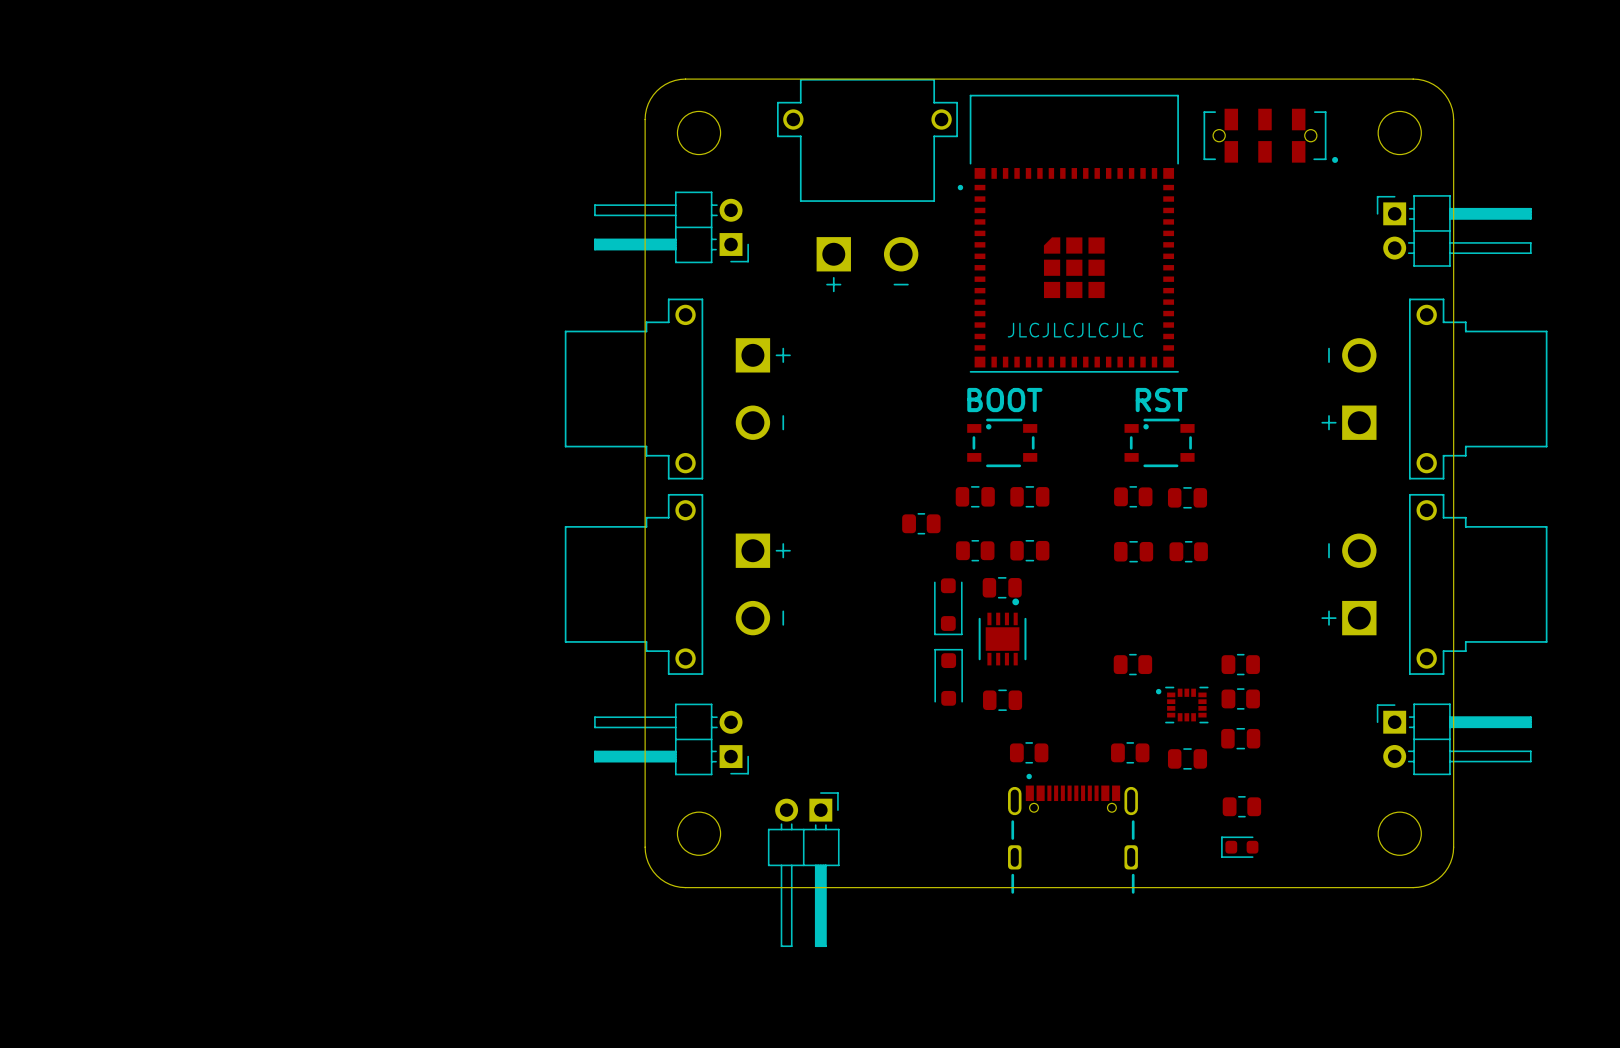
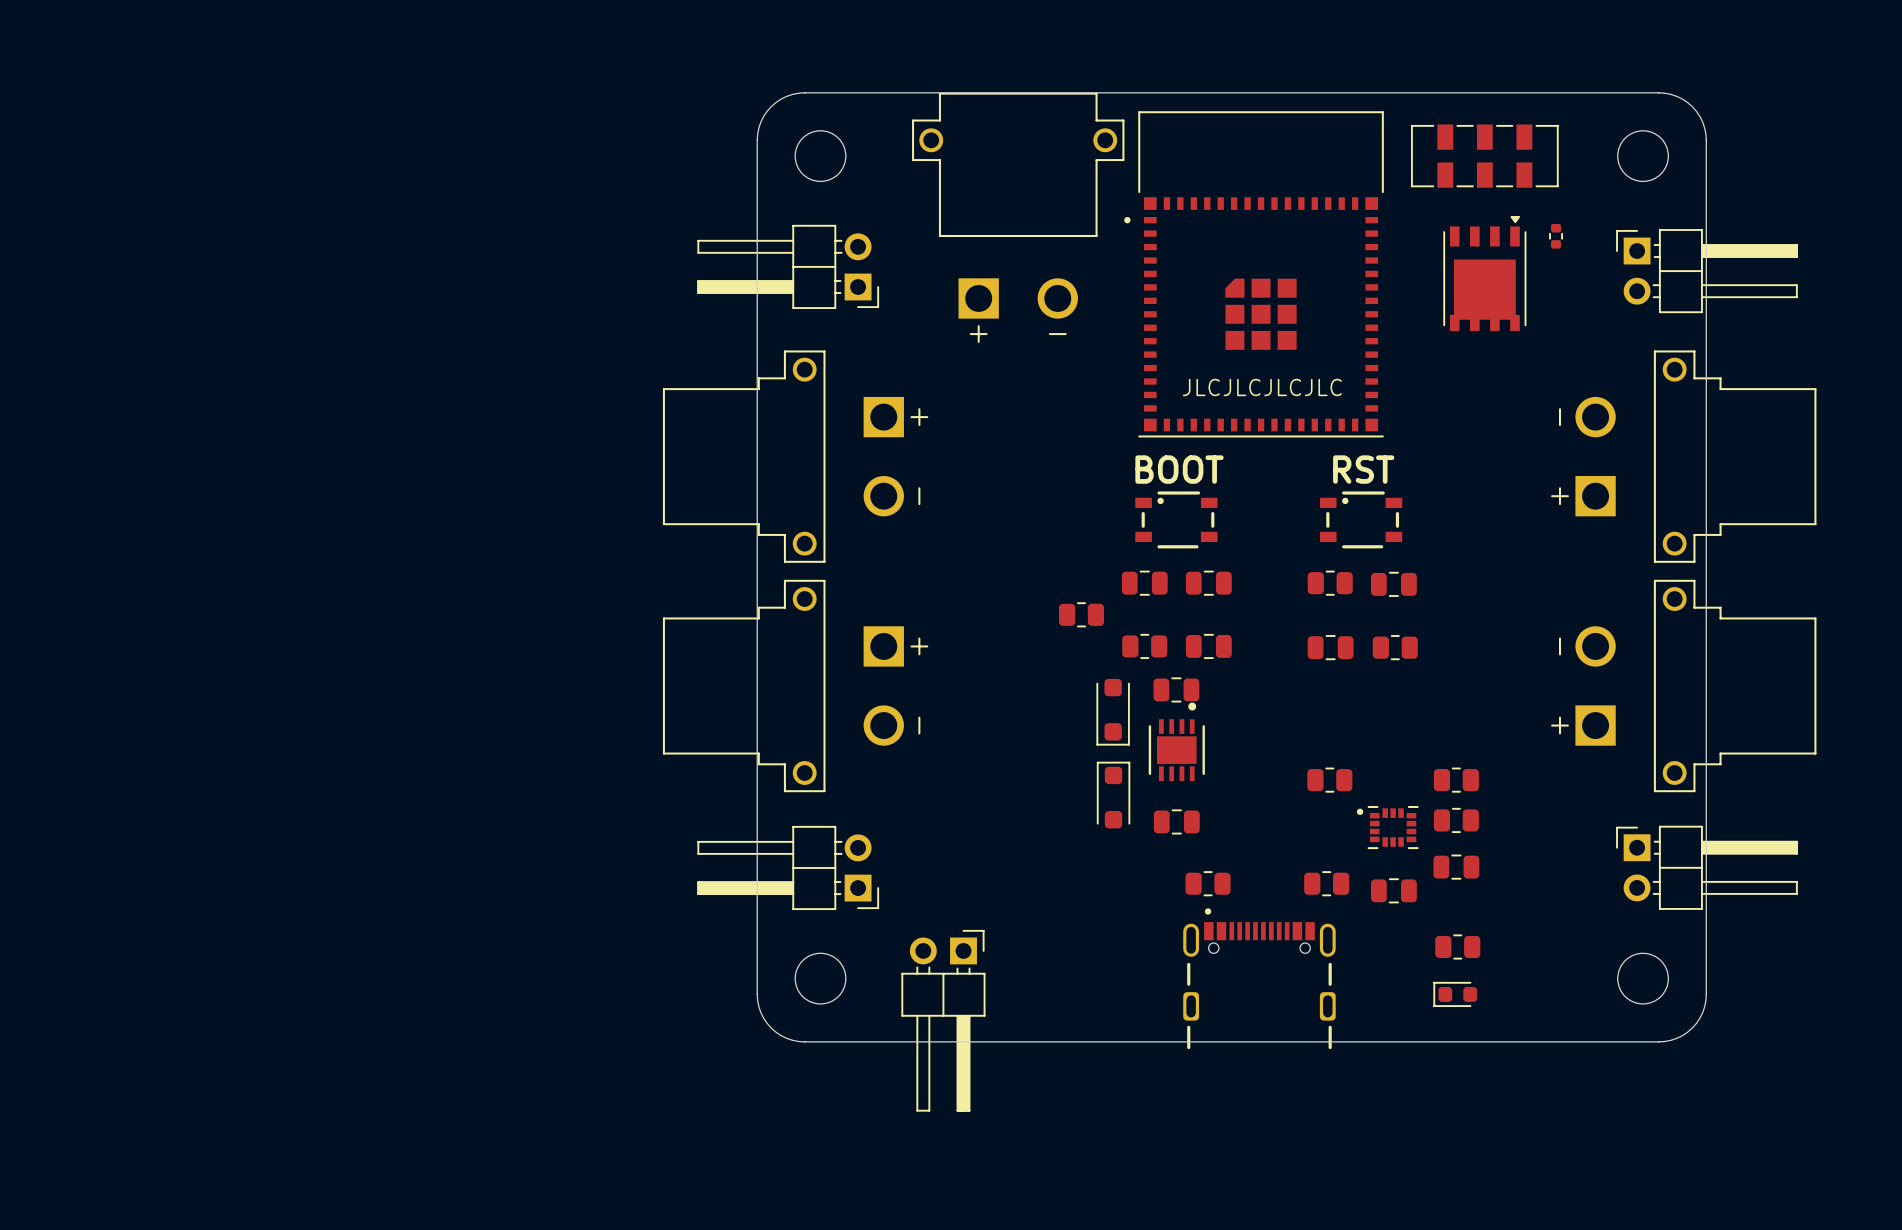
part footprint: [1203, 108, 1339, 163] -> [1410, 124, 1559, 188]
part: none -> (1556, 236)
part: none -> (1484, 273)

